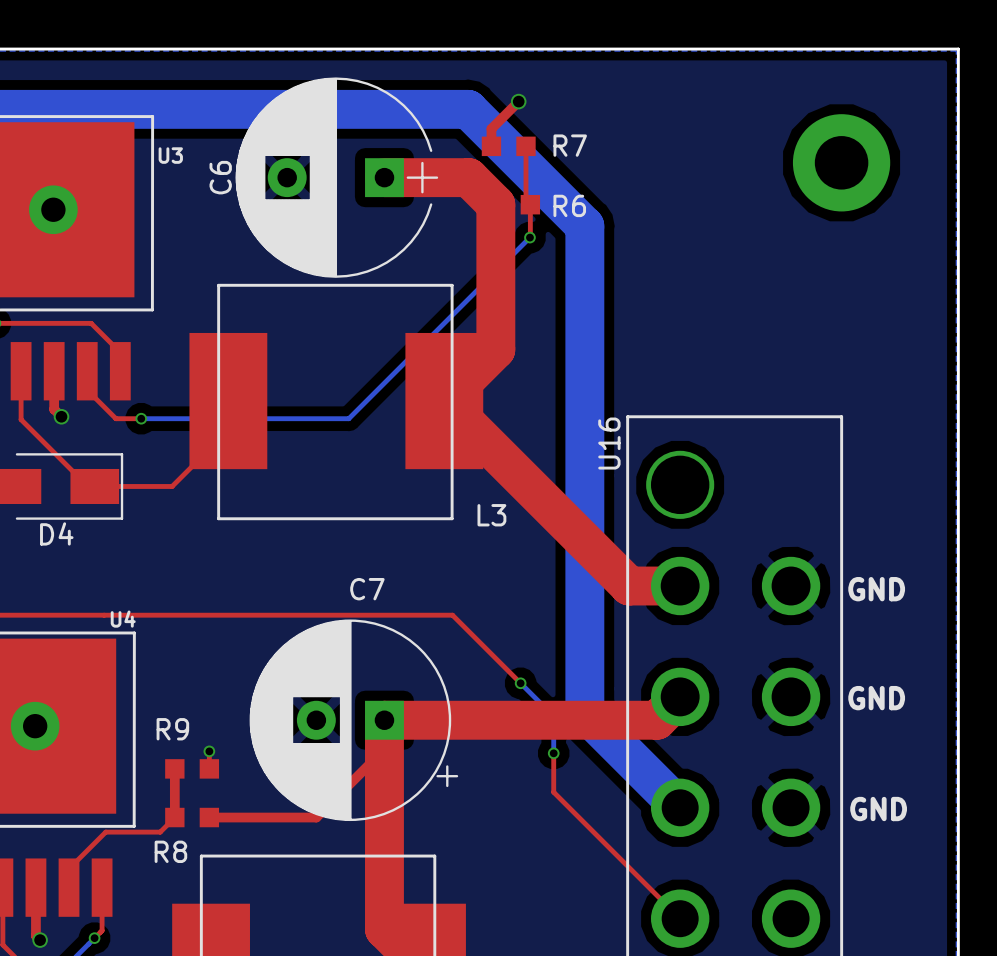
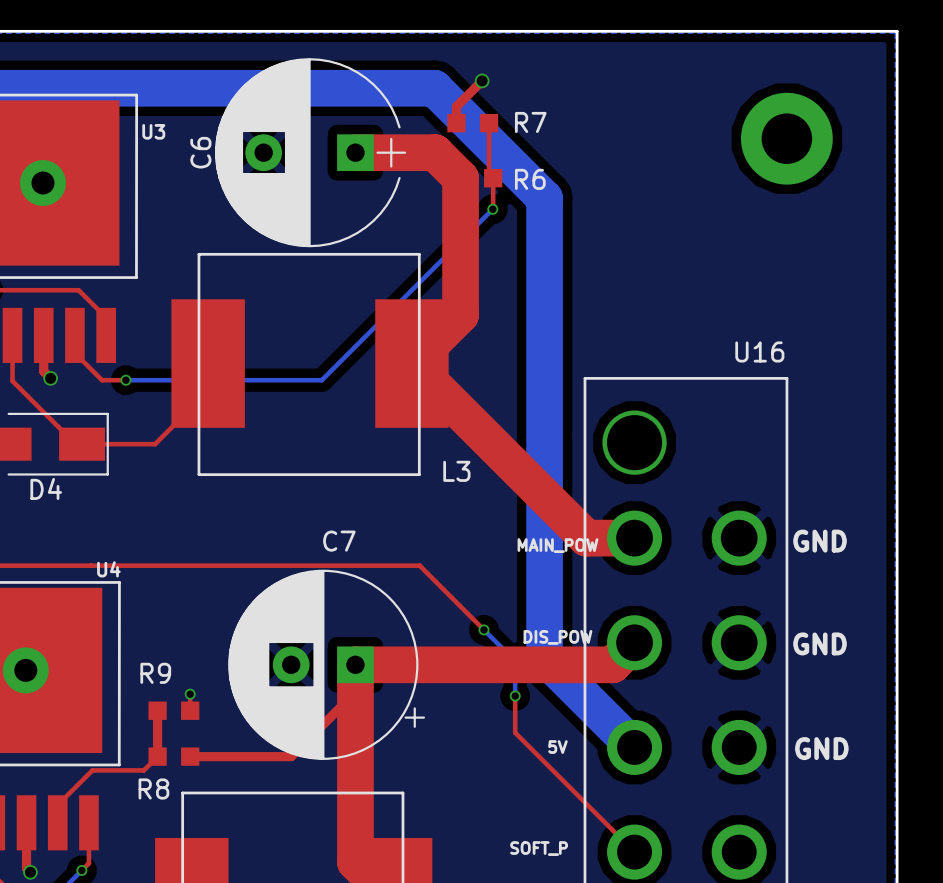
U16 name rotation: 0° (609, 443) -> 90° clockwise (759, 351)
U16 name position: U16 (609, 443) -> U16 (759, 351)
text: none -> MAIN_POW (557, 545)
text: none -> DIS_POW (557, 637)
text: none -> 5V (557, 747)
text: none -> SOFT_P (539, 848)

